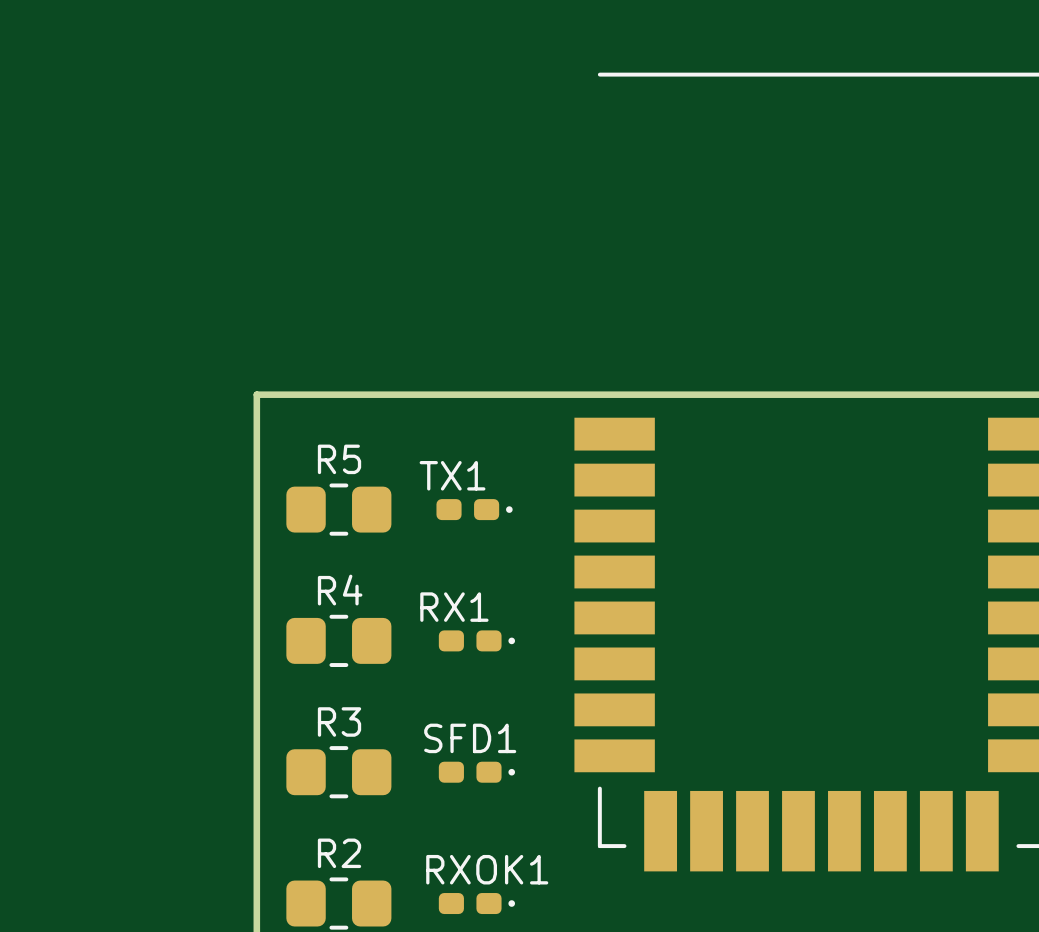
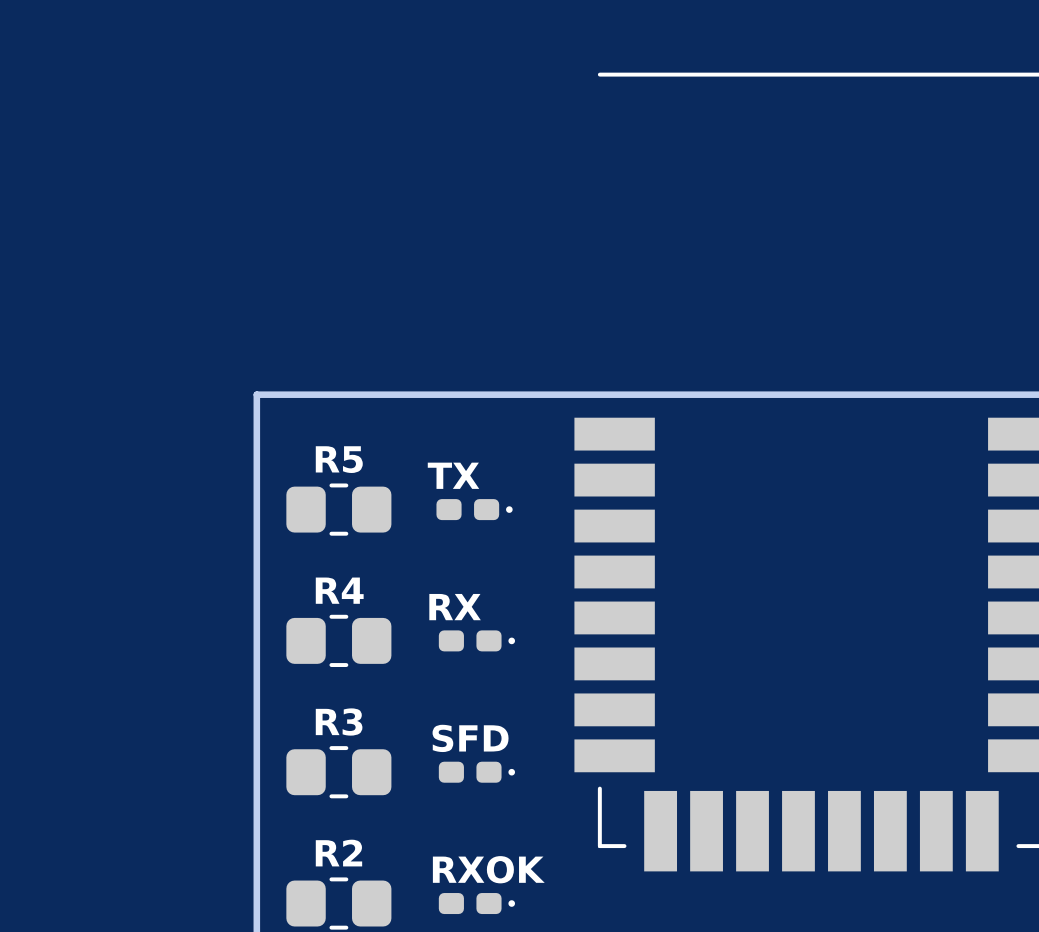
TX1 name: TX1 (452, 475) -> TX (453, 475)
RX1 name: RX1 (454, 607) -> RX (455, 607)
SFD1 name: SFD1 (470, 738) -> SFD (470, 738)
RXOK1 name: RXOK1 (487, 869) -> RXOK (488, 869)

